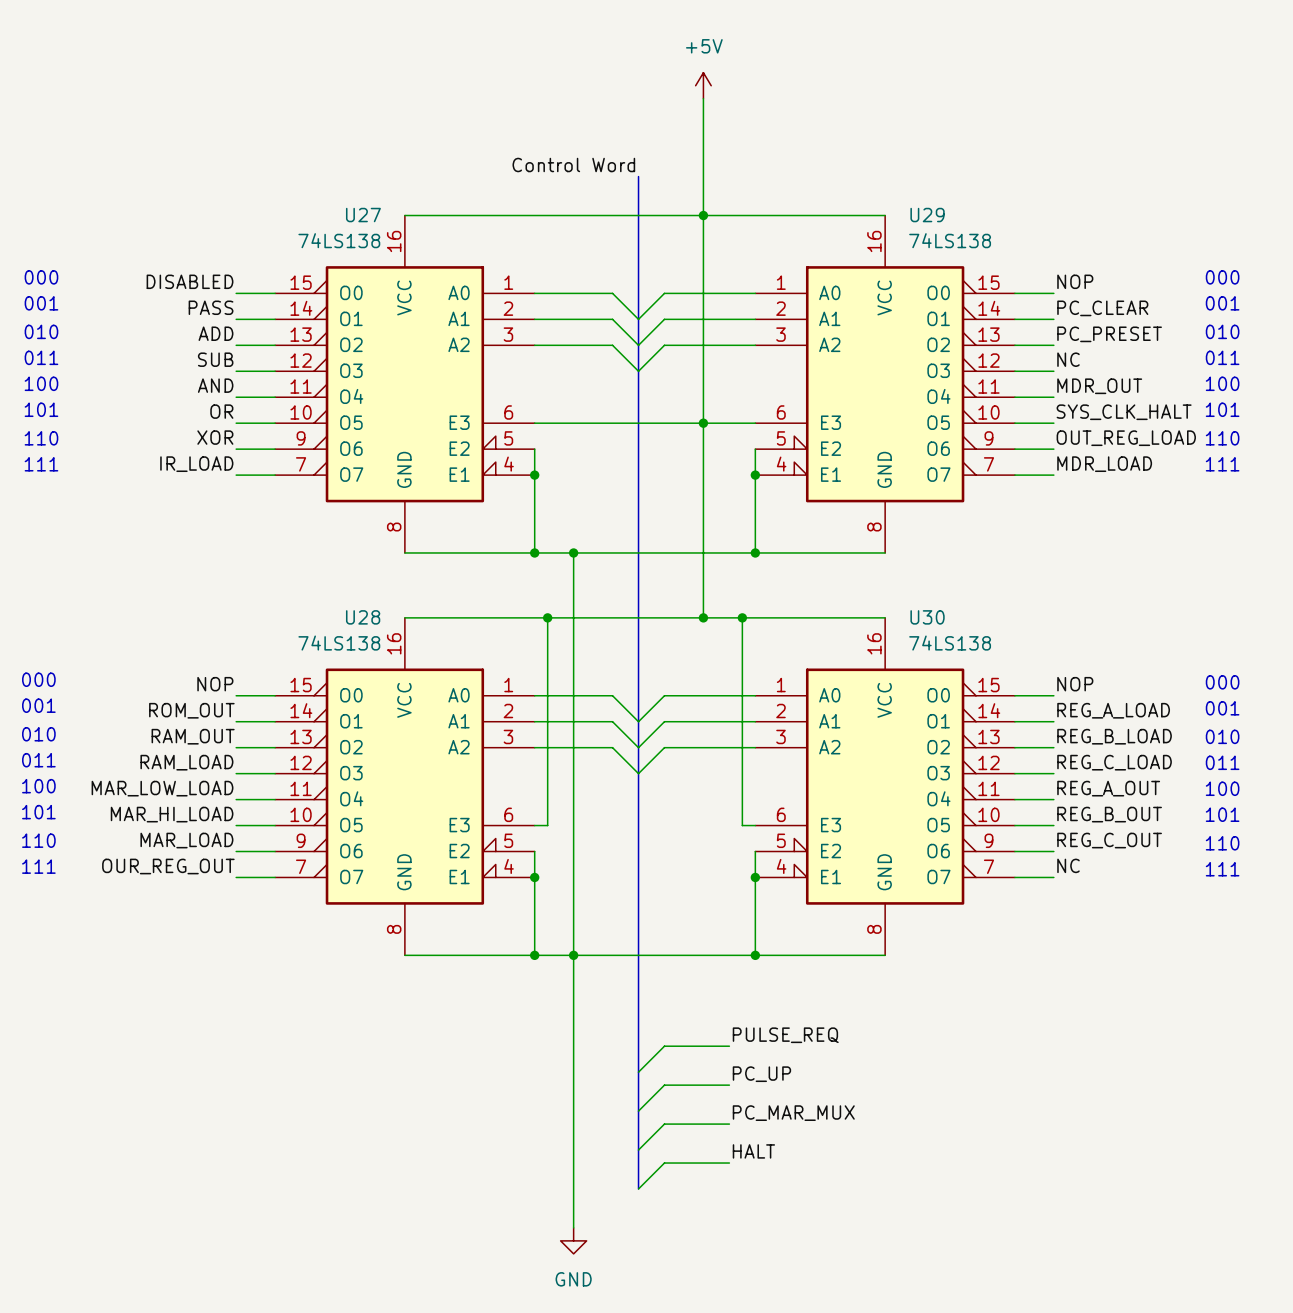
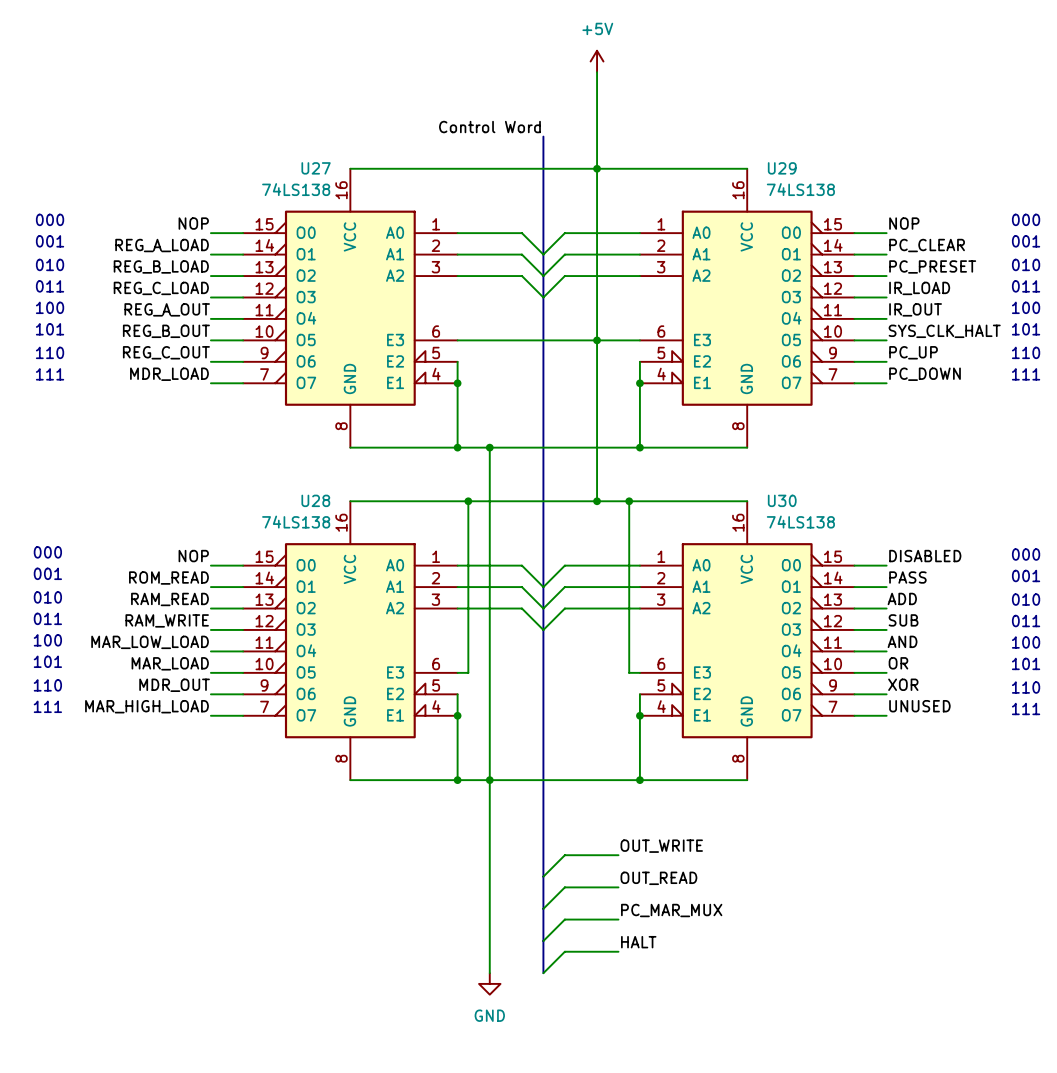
label: DISABLED (190, 281) -> NOP (193, 223)
label: PASS (211, 307) -> REG_A_LOAD (162, 245)
label: ADD (215, 333) -> REG_B_LOAD (161, 266)
label: SUB (215, 359) -> REG_C_LOAD (161, 288)
label: NC (1068, 359) -> IR_LOAD (919, 288)
label: AND (215, 385) -> REG_A_OUT (167, 309)
label: MDR_OUT (1099, 386) -> IR_OUT (915, 309)
label: OR (221, 411) -> REG_B_OUT (166, 331)
label: XOR (215, 437) -> REG_C_OUT (166, 352)
label: OUT_REG_LOAD (1126, 438) -> PC_UP (913, 352)
label: IR_LOAD (196, 464) -> MDR_LOAD (169, 374)
label: MDR_LOAD (1104, 464) -> PC_DOWN (925, 374)
label: NOP (1075, 684) -> DISABLED (925, 556)
label: ROM_OUT (191, 710) -> ROM_READ (168, 578)
label: REG_A_LOAD (1113, 710) -> PASS (907, 577)
label: RAM_OUT (193, 736) -> RAM_READ (169, 599)
label: REG_B_LOAD (1114, 736) -> ADD (902, 598)
label: RAM_LOAD (186, 762) -> RAM_WRITE (167, 620)
label: REG_C_LOAD (1114, 762) -> SUB (903, 620)
label: REG_A_OUT (1108, 788) -> AND (902, 641)
label: MAR_HI_LOAD (172, 814) -> MAR_LOAD (170, 663)
label: REG_B_OUT (1109, 814) -> OR (898, 663)
label: MAR_LOAD (186, 840) -> MDR_OUT (174, 685)
label: REG_C_OUT (1109, 840) -> XOR (903, 684)
label: NC (1068, 865) -> UNUSED (919, 706)
label: OUR_REG_OUT (168, 866) -> MAR_HIGH_LOAD (146, 706)
label: PULSE_REQ (785, 1035) -> OUT_WRITE (661, 846)
label: PC_UP (761, 1074) -> OUT_READ (658, 878)
wire: (573, 1188) (573, 1227) -> none
power symbol position: GND (573, 1240) -> GND (489, 983)

